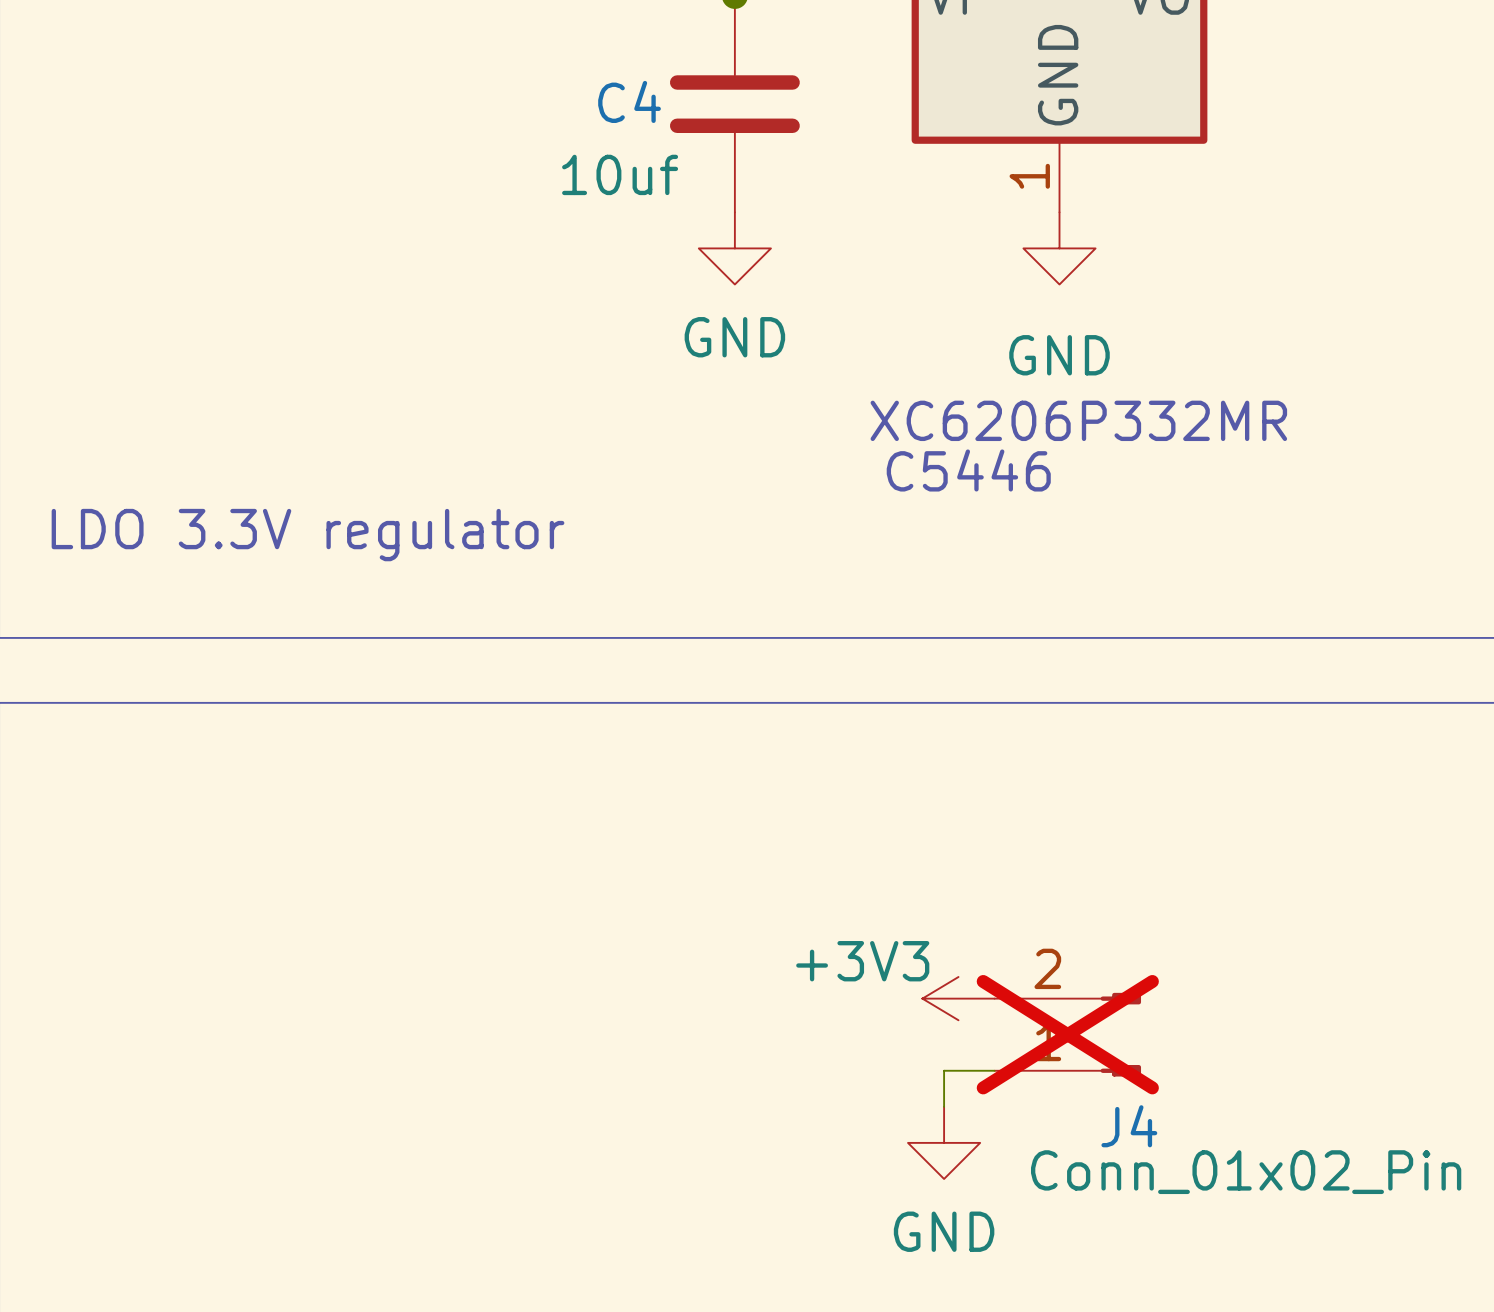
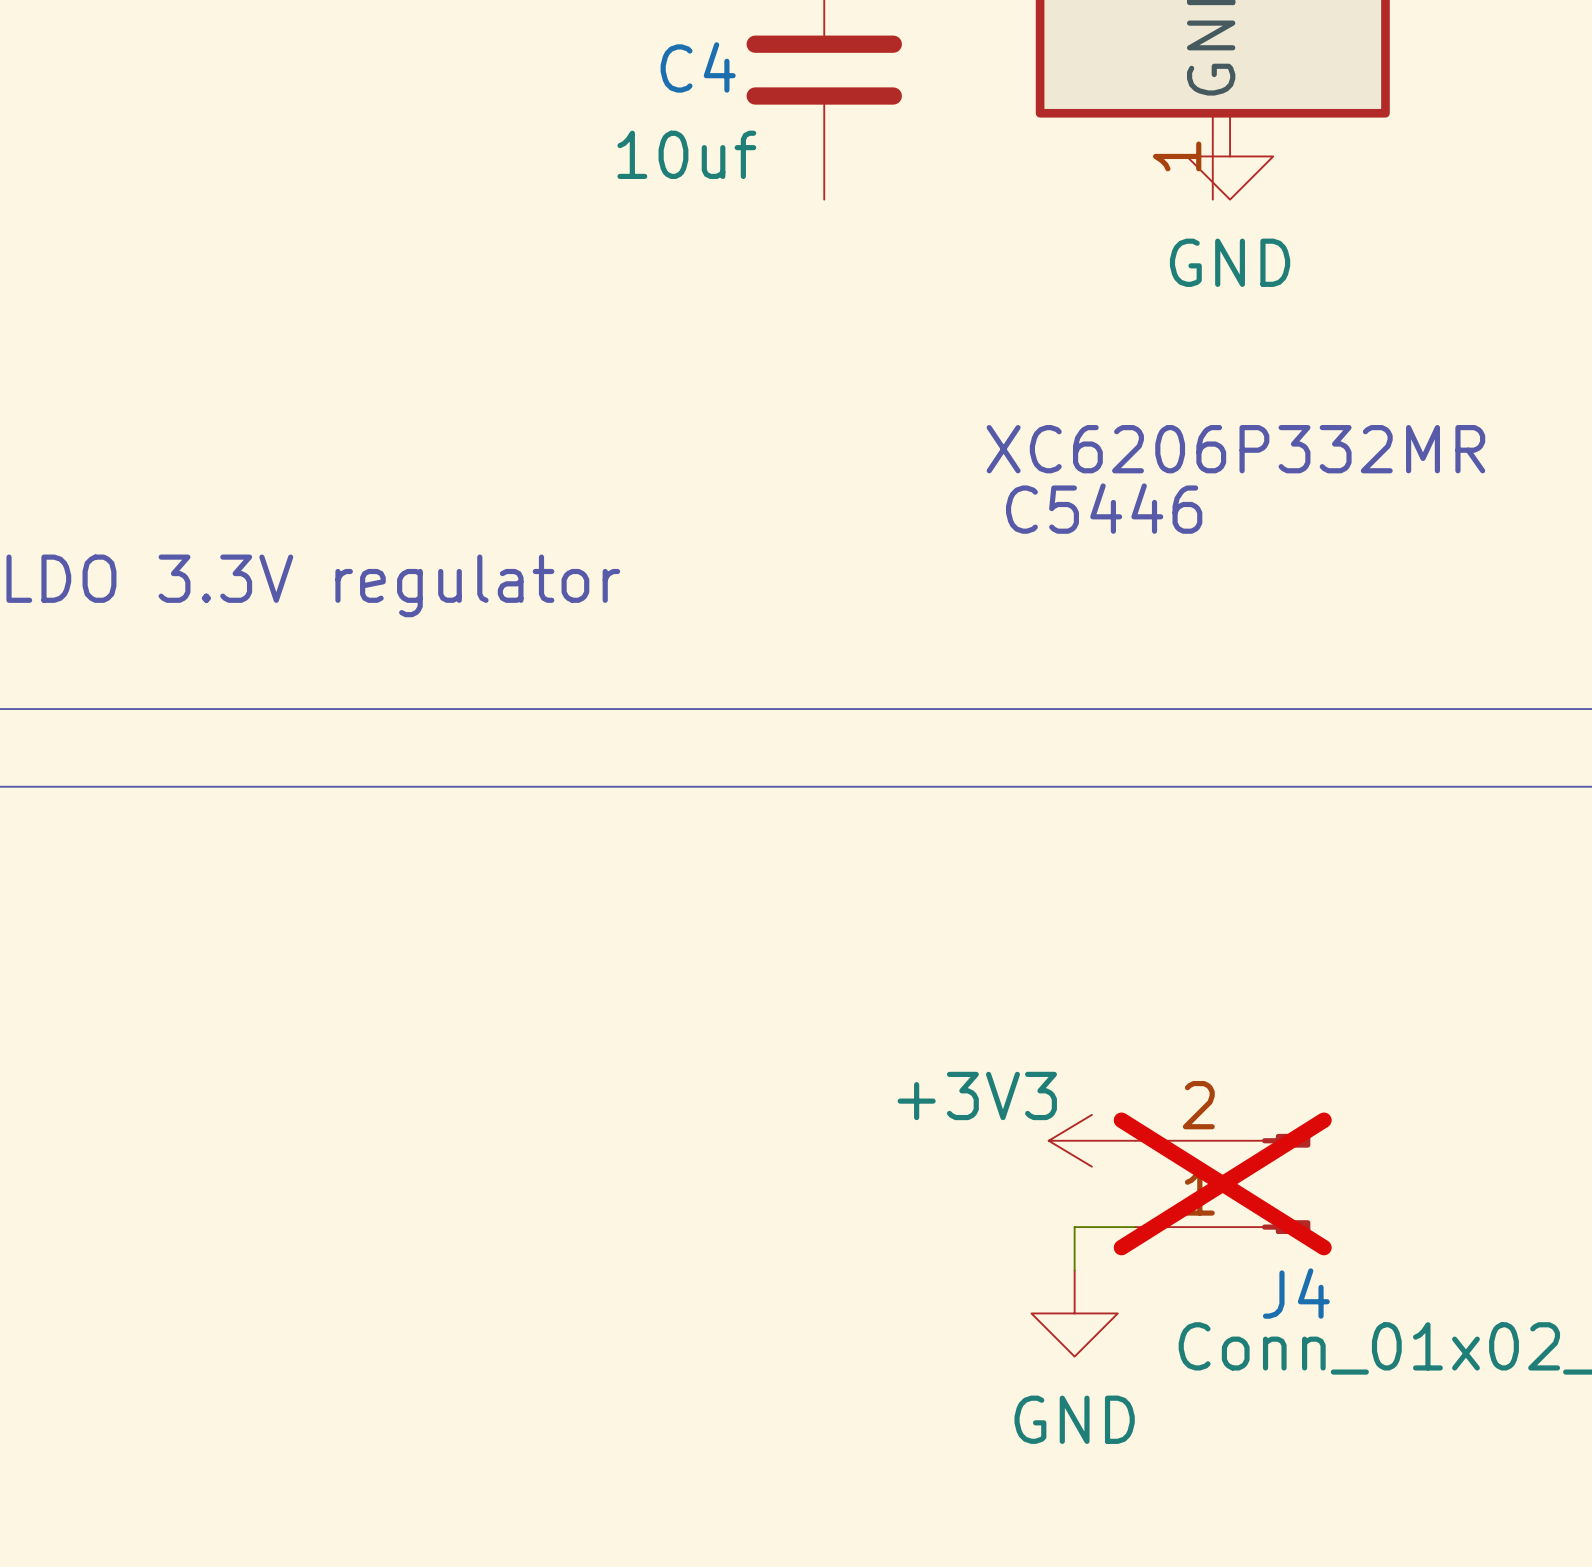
power symbol: GND (734, 248) -> none
power symbol position: GND (1059, 248) -> GND (1230, 156)
power symbol text position: GND (1059, 355) -> GND (1230, 262)

